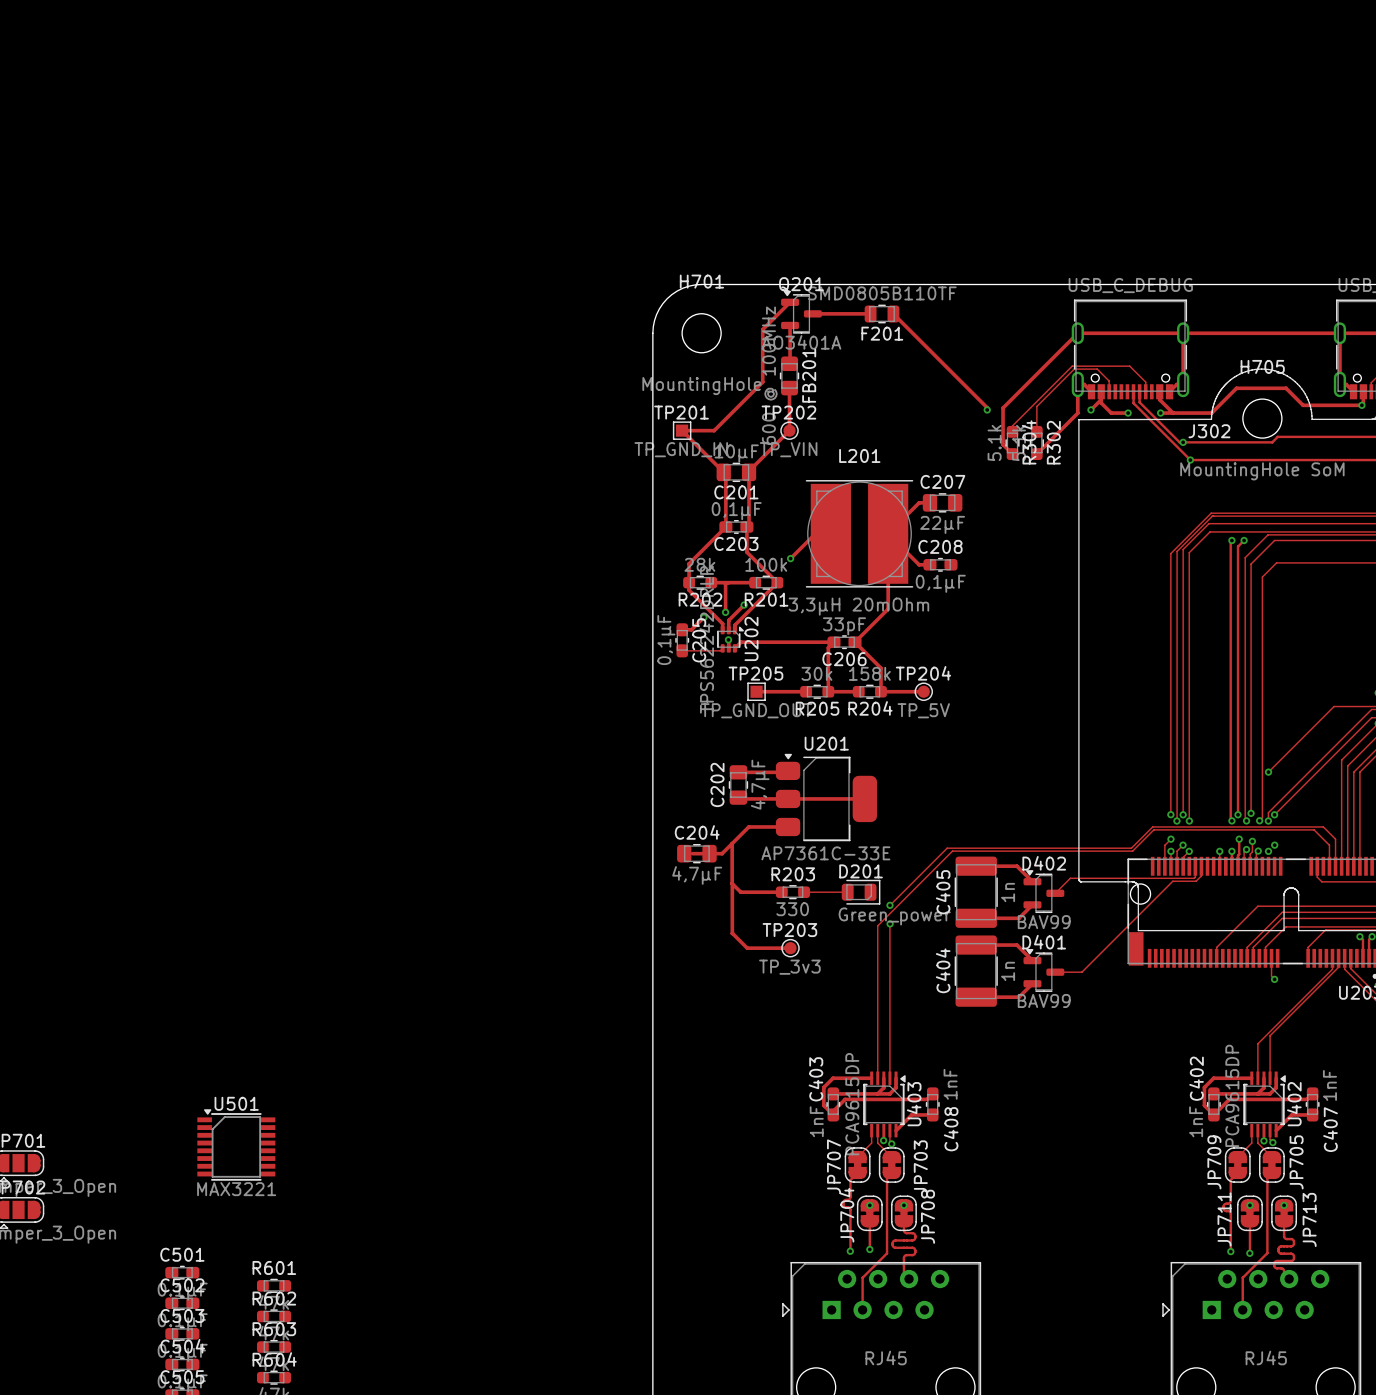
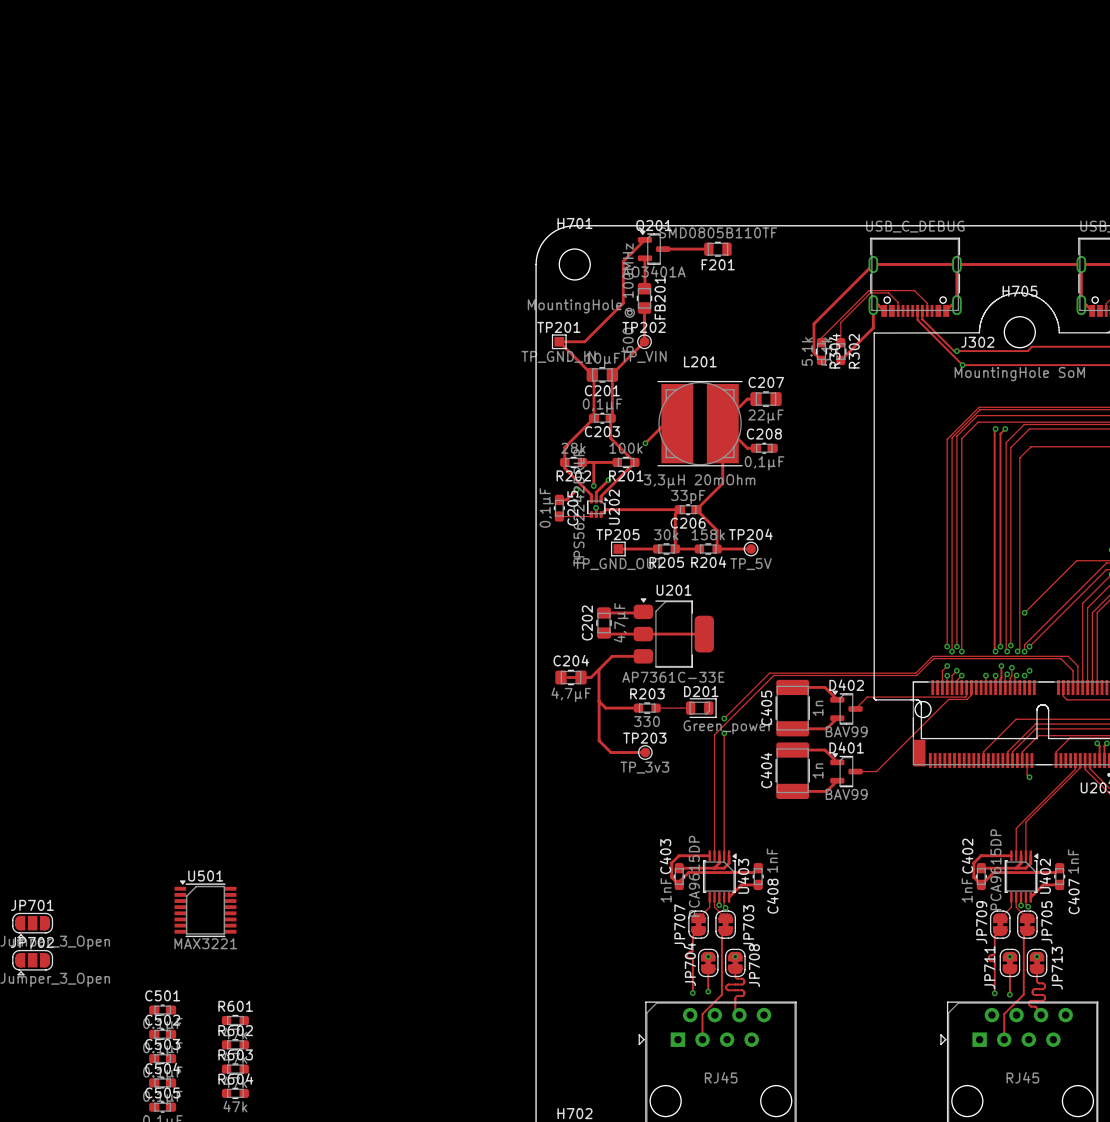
track: (893, 313) (987, 407) (987, 409) -> none
track: (1101, 391) (1101, 402) (1111, 413) (1128, 413) -> none
track: (1159, 391) (1159, 399) (1173, 413) -> none
track: (1363, 391) (1361, 405) (1303, 405) (1286, 388) (1236, 388) (1211, 413) (1160, 413) -> none
track: (1101, 399) (1090, 409) -> none
via: (1361, 405) -> none
via: (987, 409) -> none
via: (1090, 409) -> none
via: (1128, 413) -> none
via: (1160, 413) -> none

